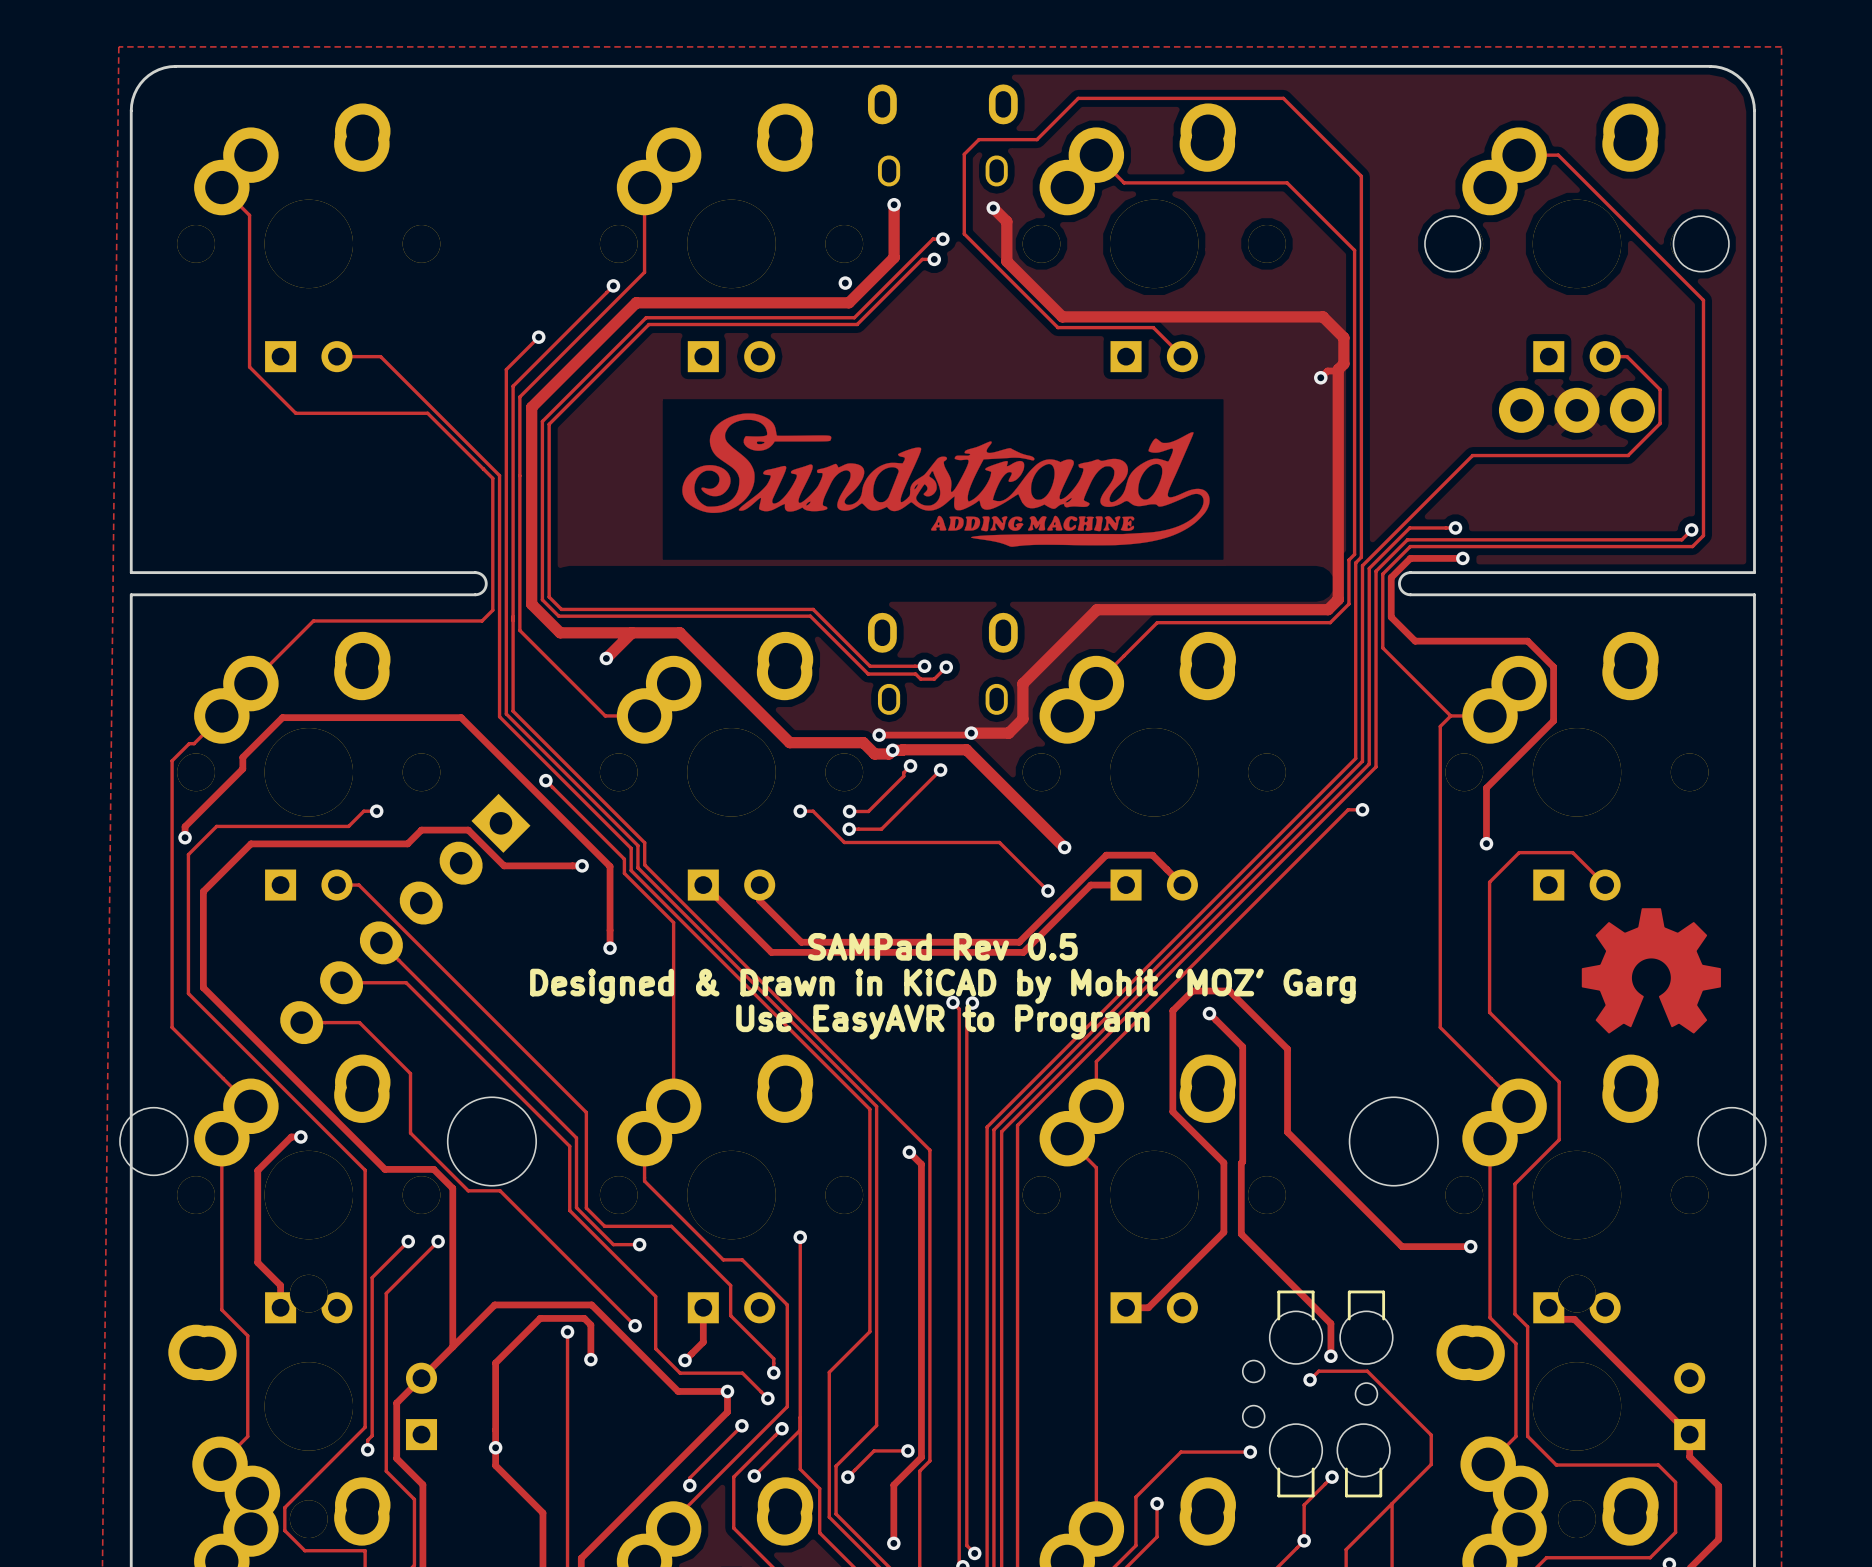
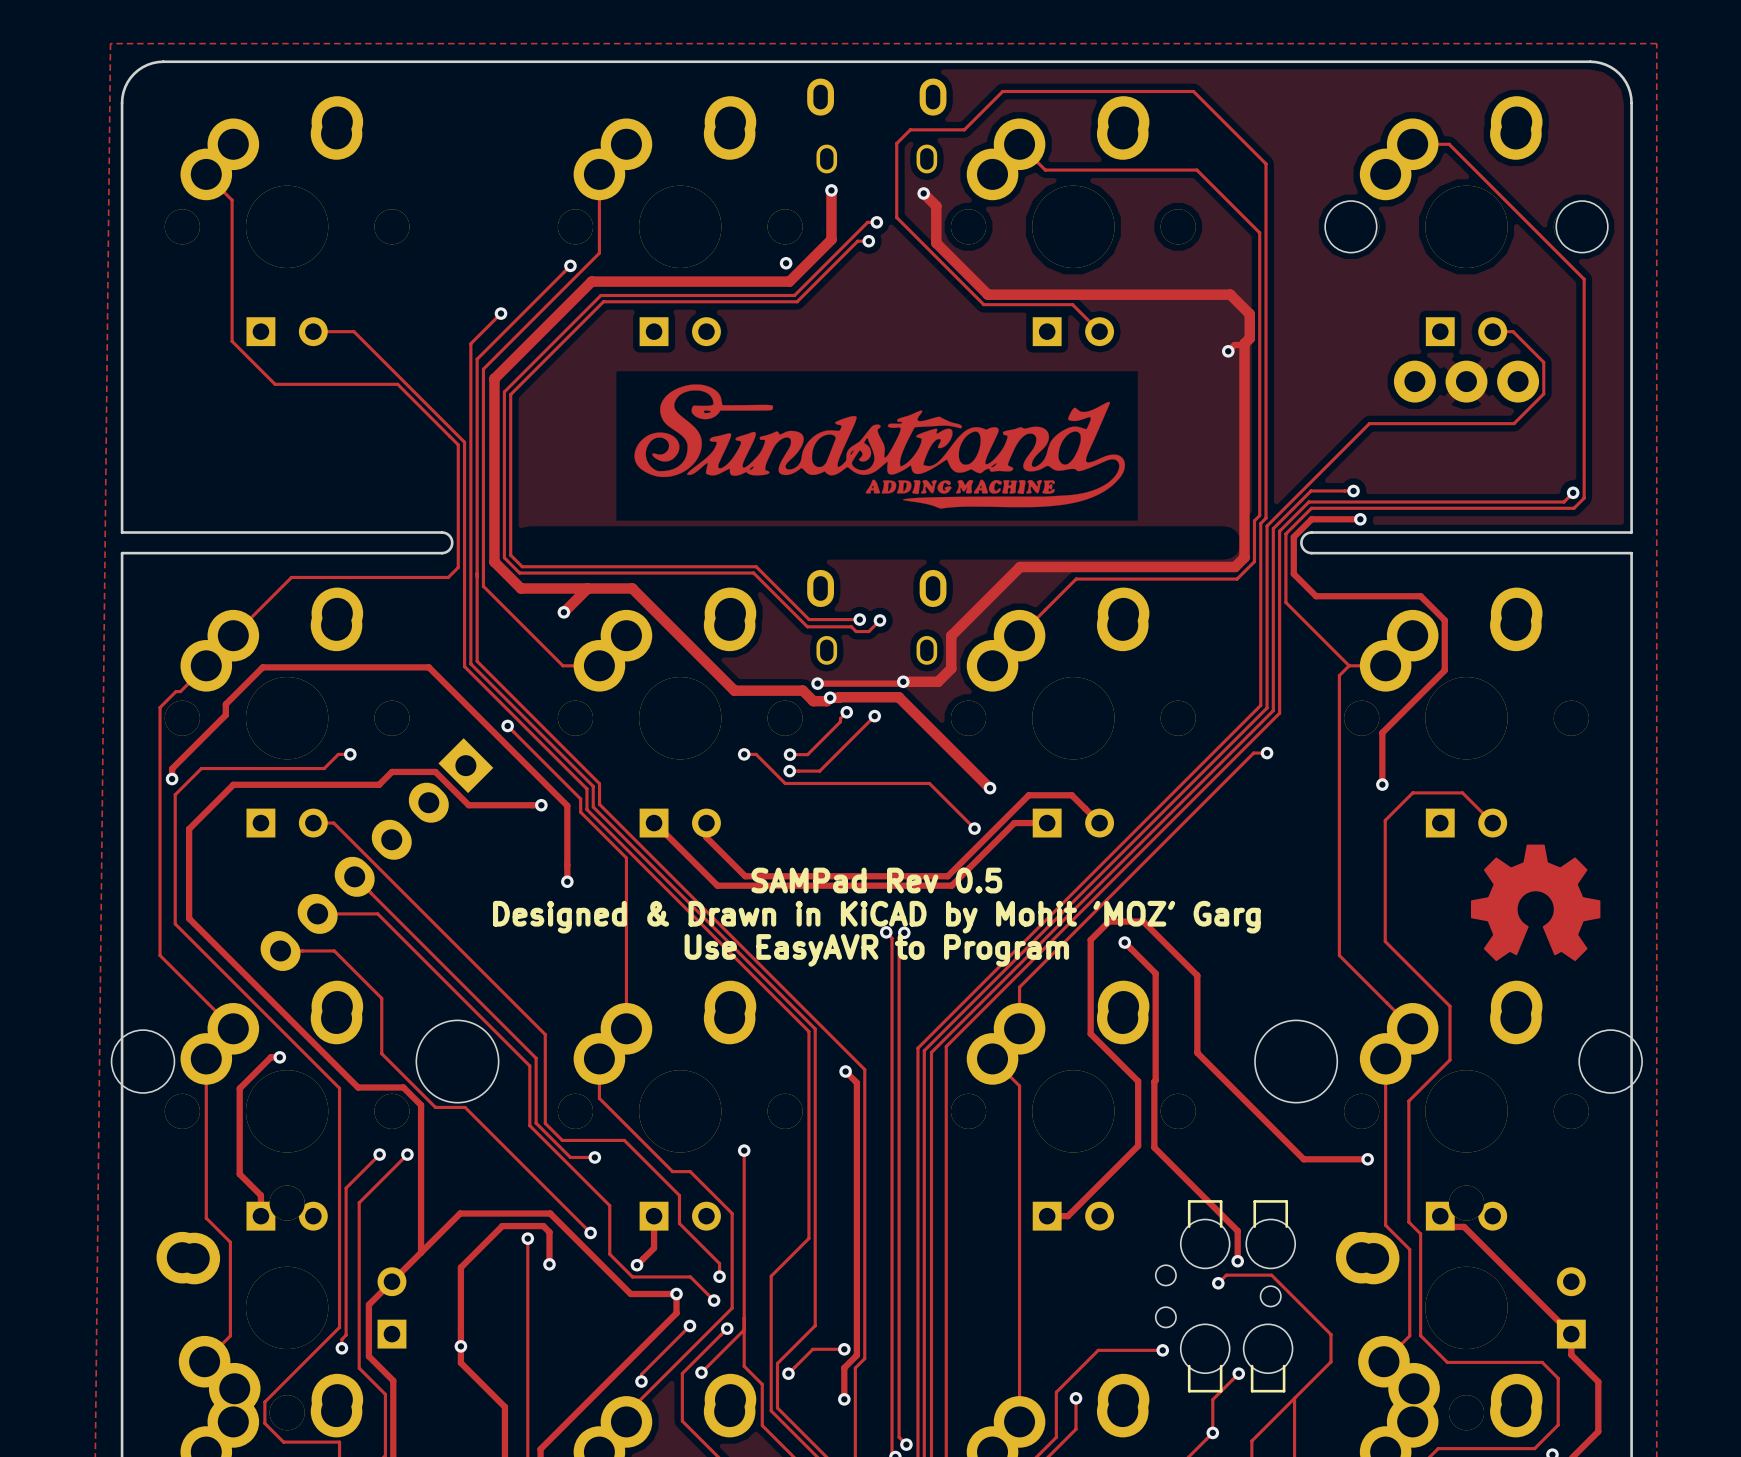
track: (907, 1470) (893, 1485) (893, 1543) -> (844, 1367) (844, 1399)
via position: (893, 1543) -> (844, 1399)

